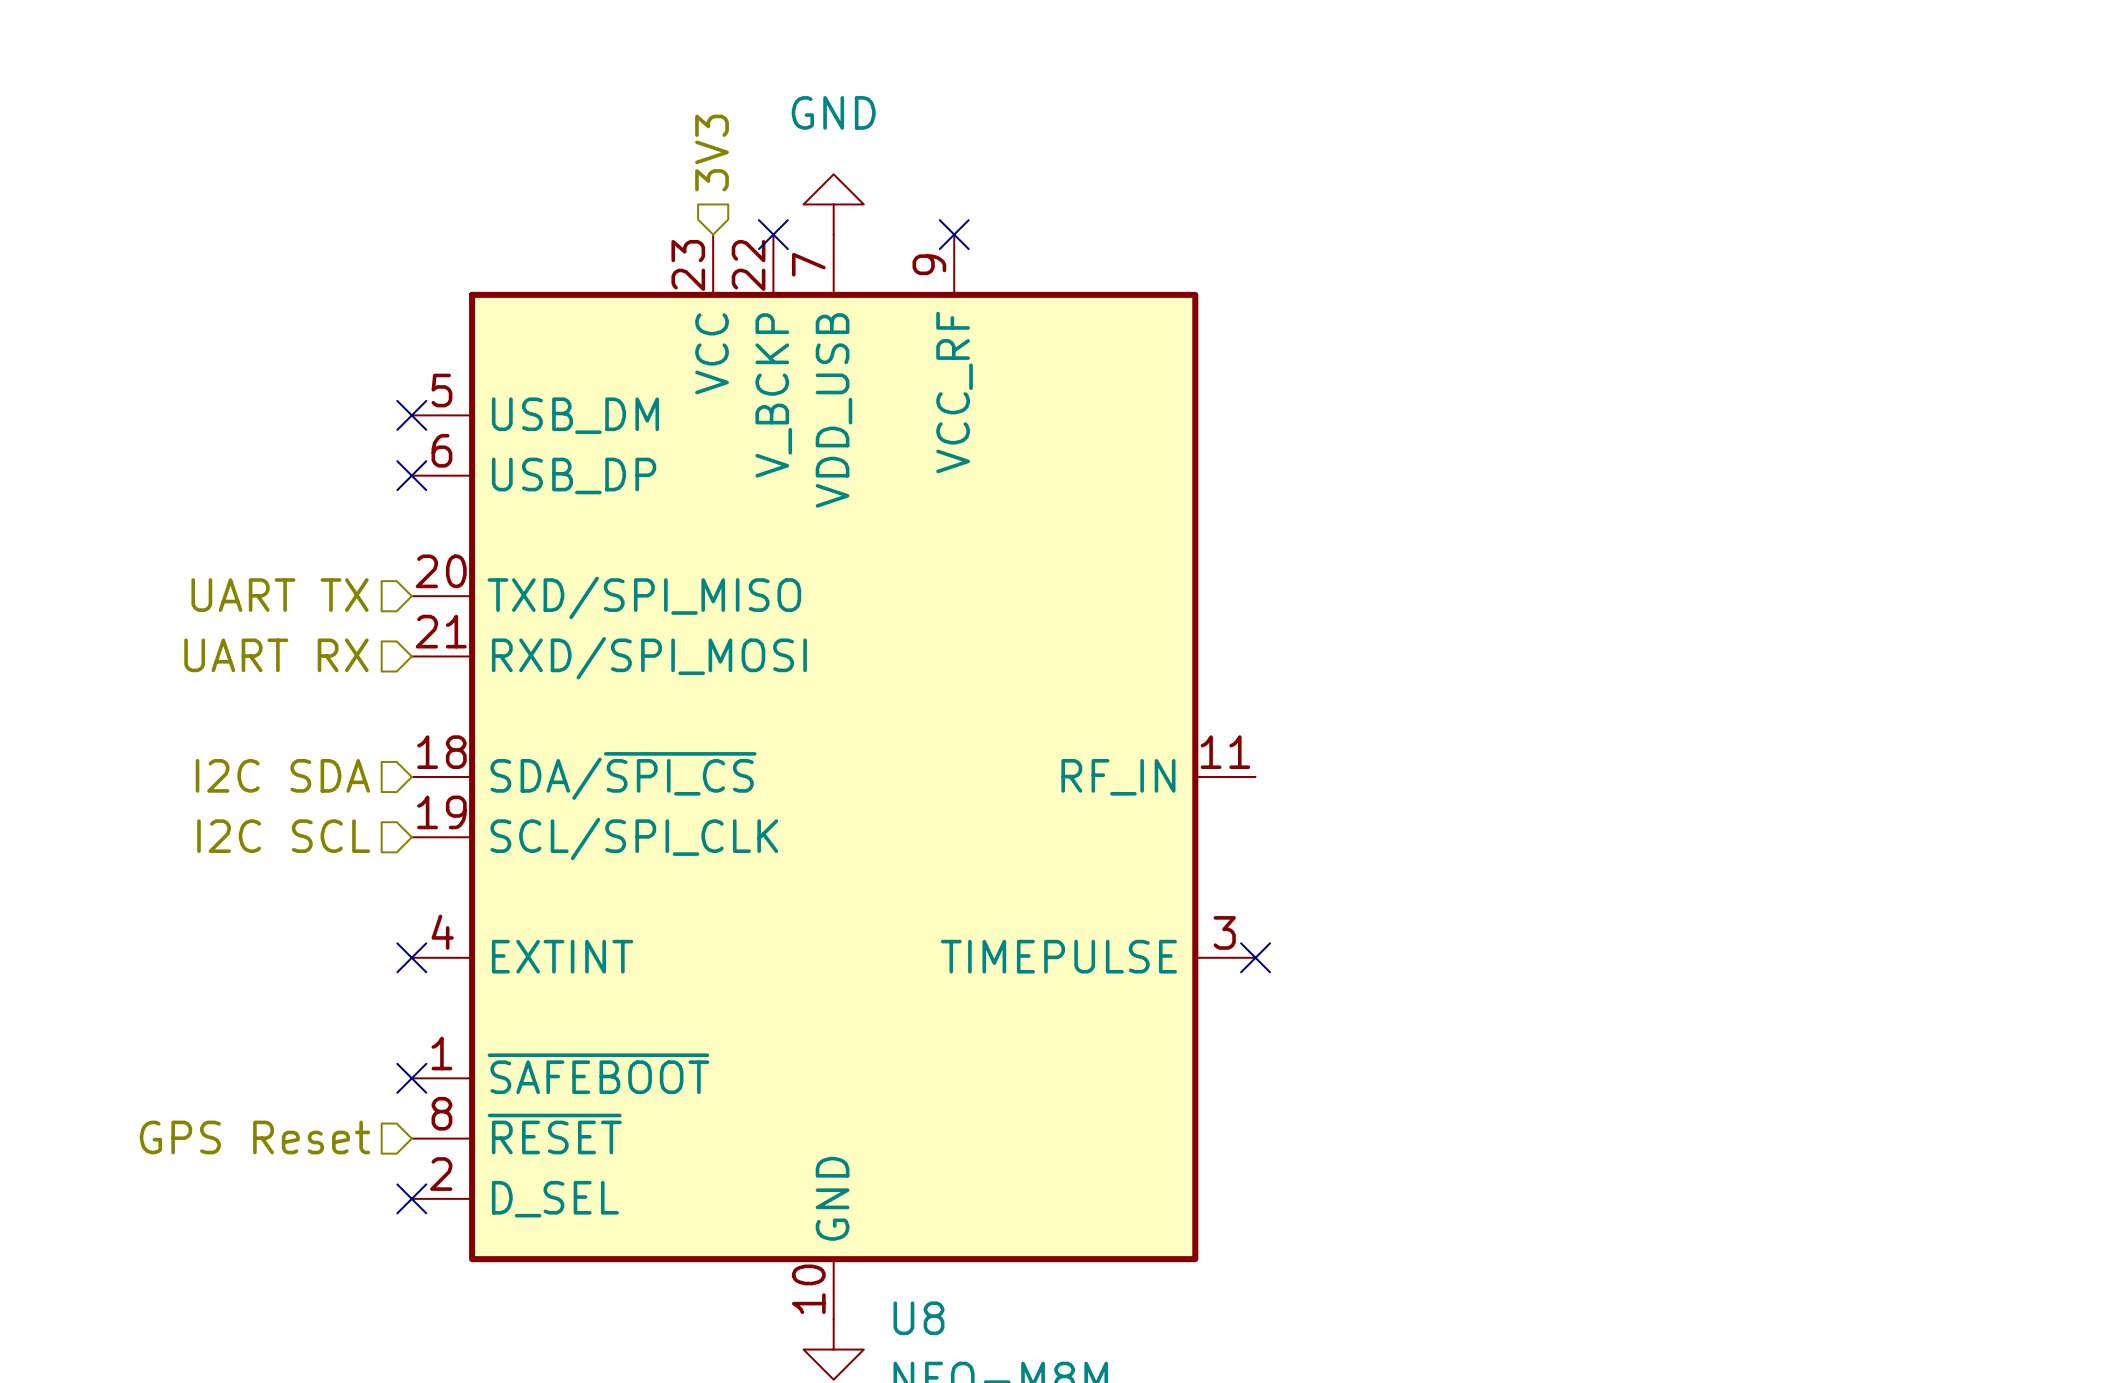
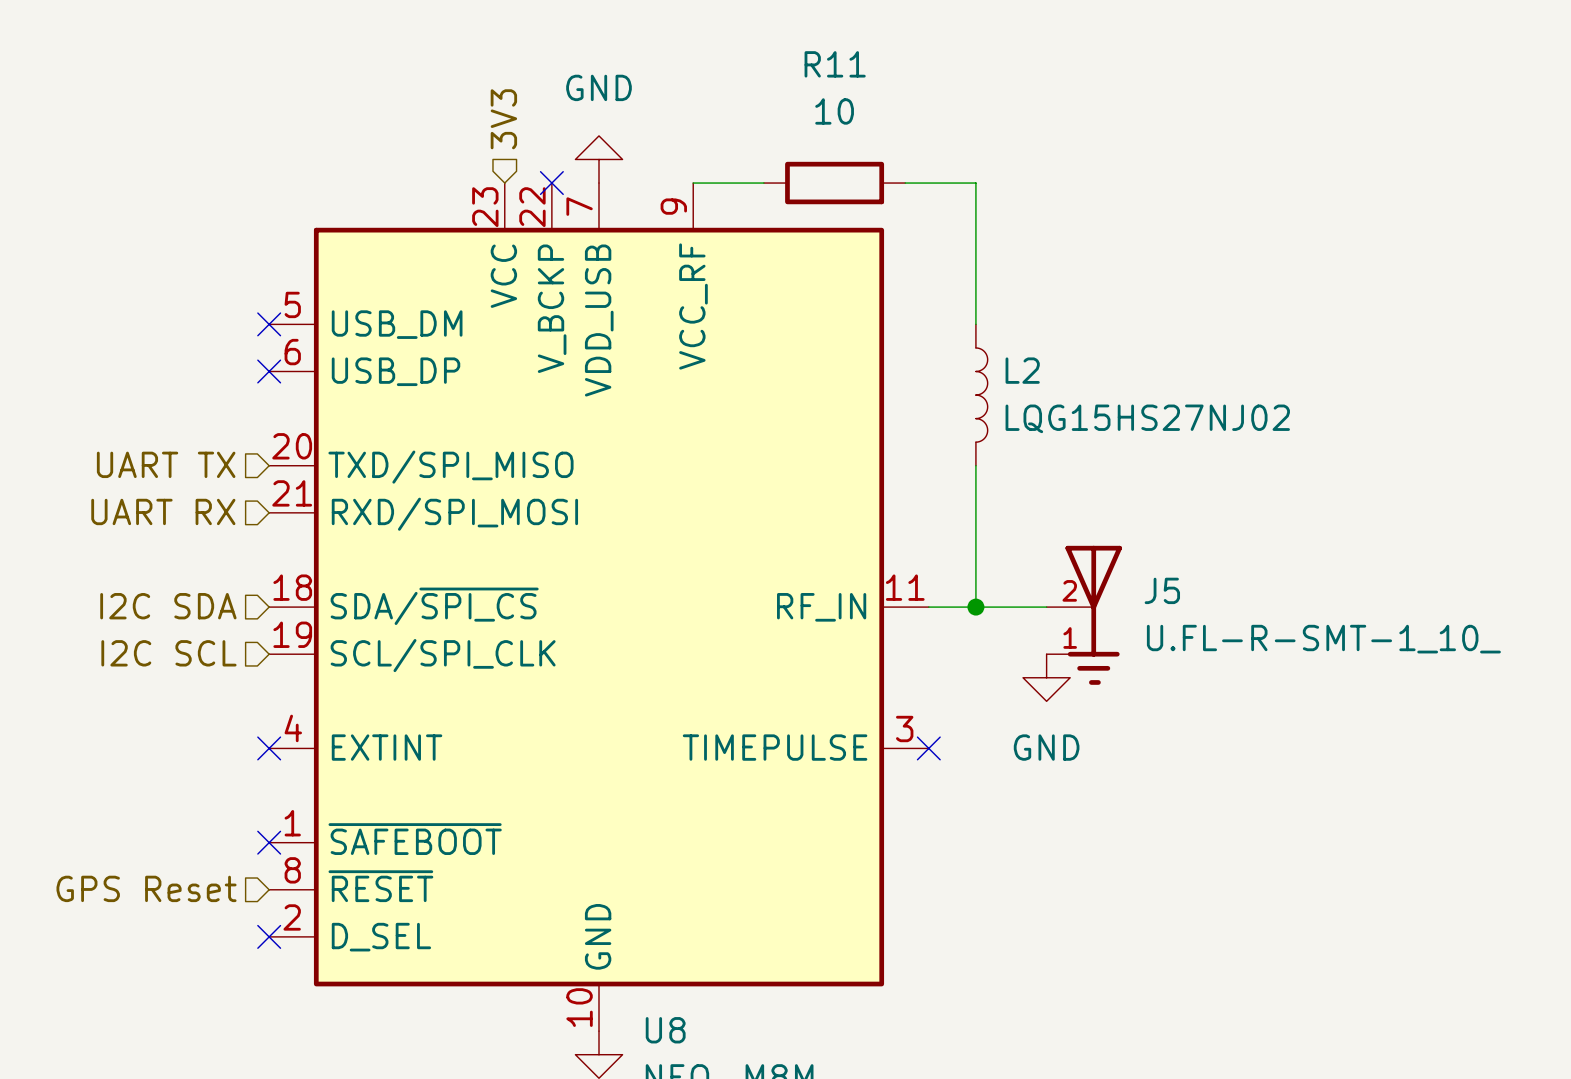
wire: none -> (693, 183) (763, 183)
no-connect mark: (954, 234) -> none
R11: none -> 10 (834, 183)
wire: none -> (905, 183) (975, 183) (975, 324)
L2: none -> LQG15HS27NJ02 (981, 395)
wire: none -> (975, 465) (975, 607)
wire: none -> (928, 607) (1046, 607)
junction: none -> (975, 607)
J5: none -> U.FL-R-SMT-1_10_ (1084, 615)
power symbol: none -> GND (1046, 677)

